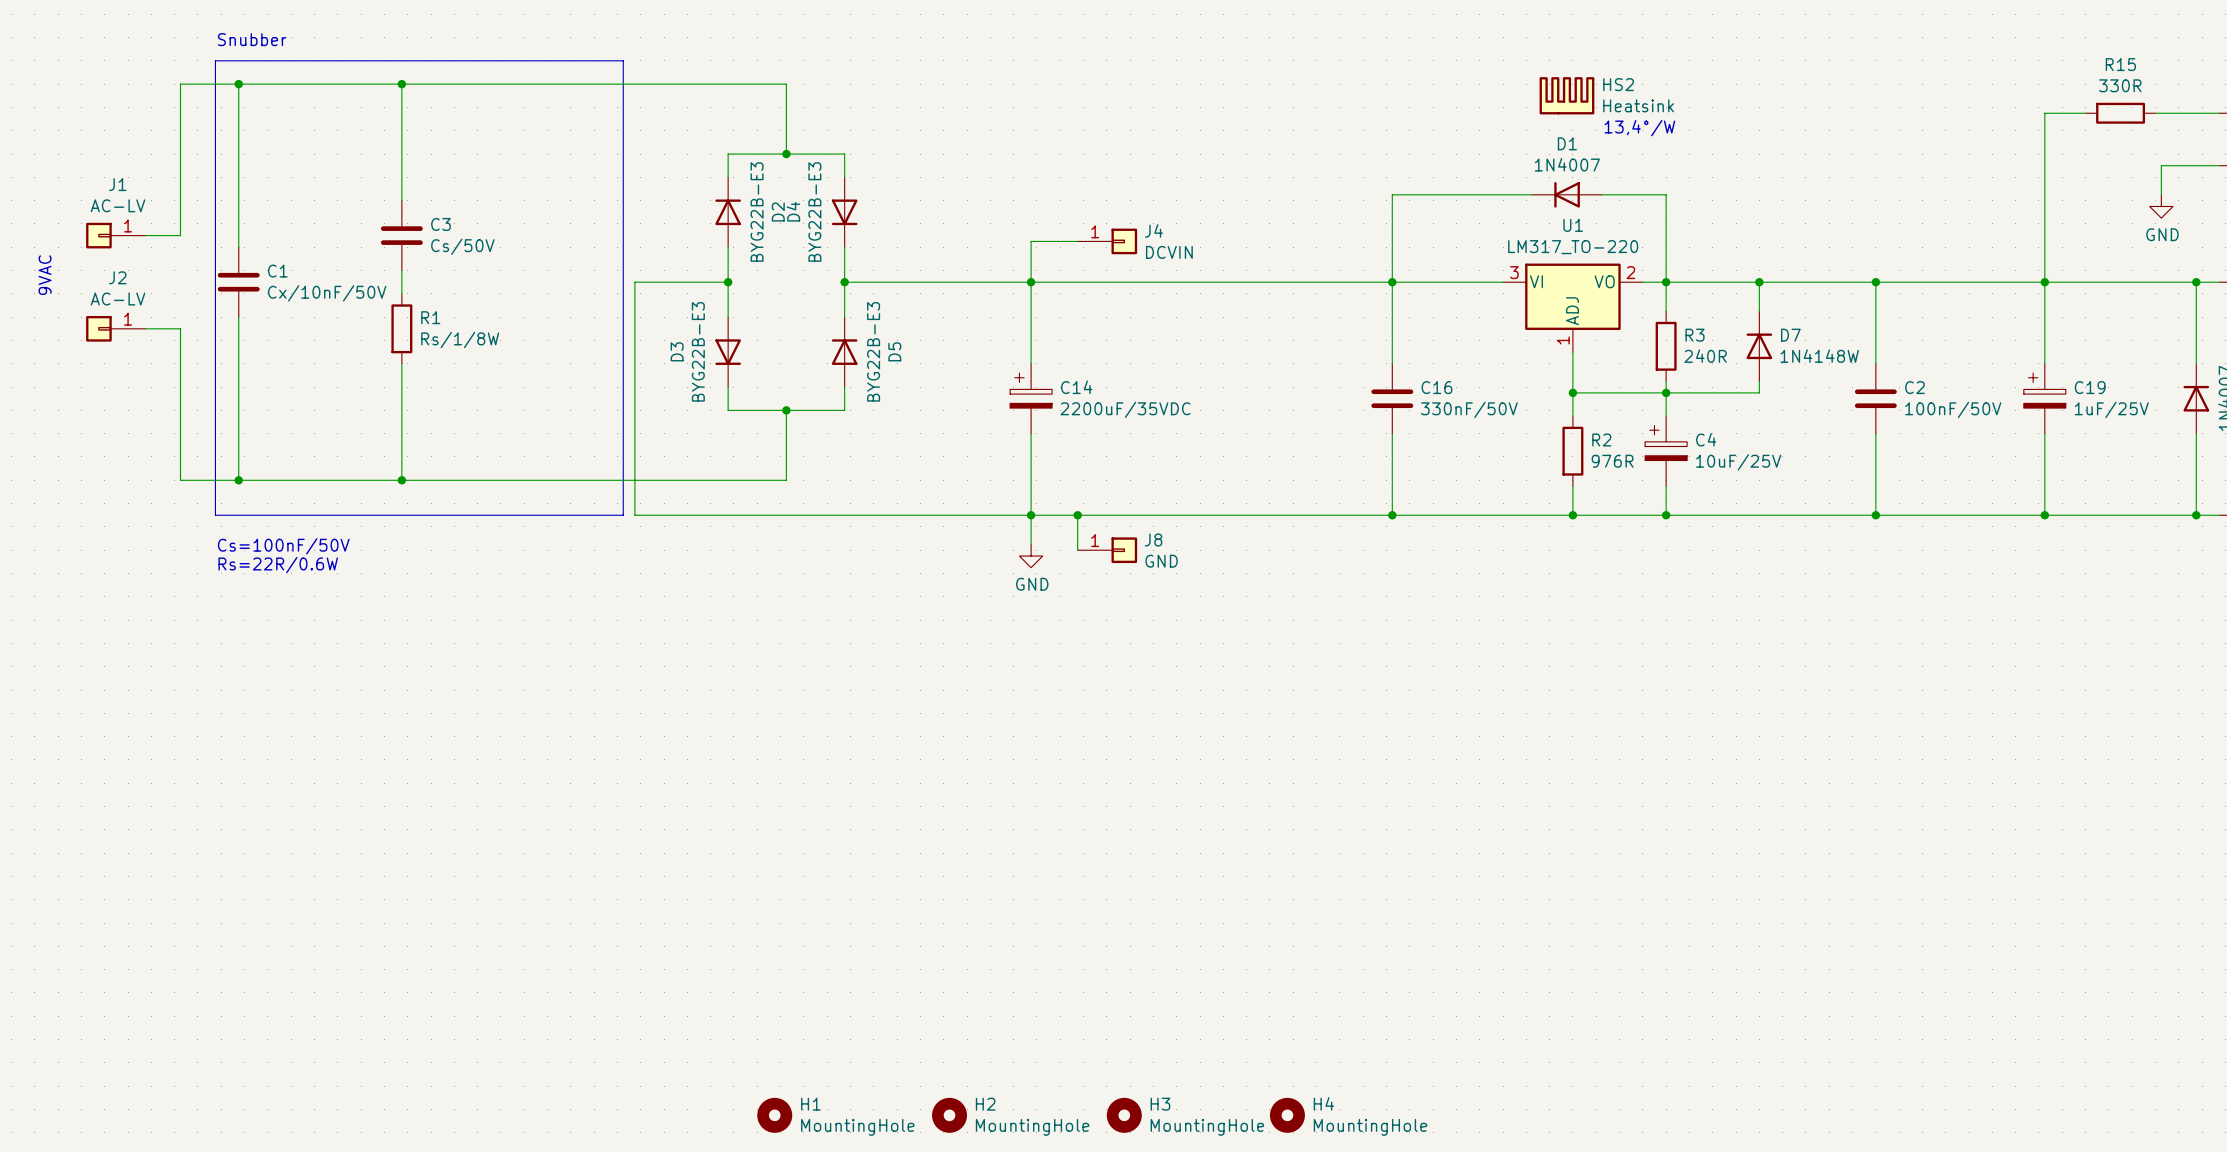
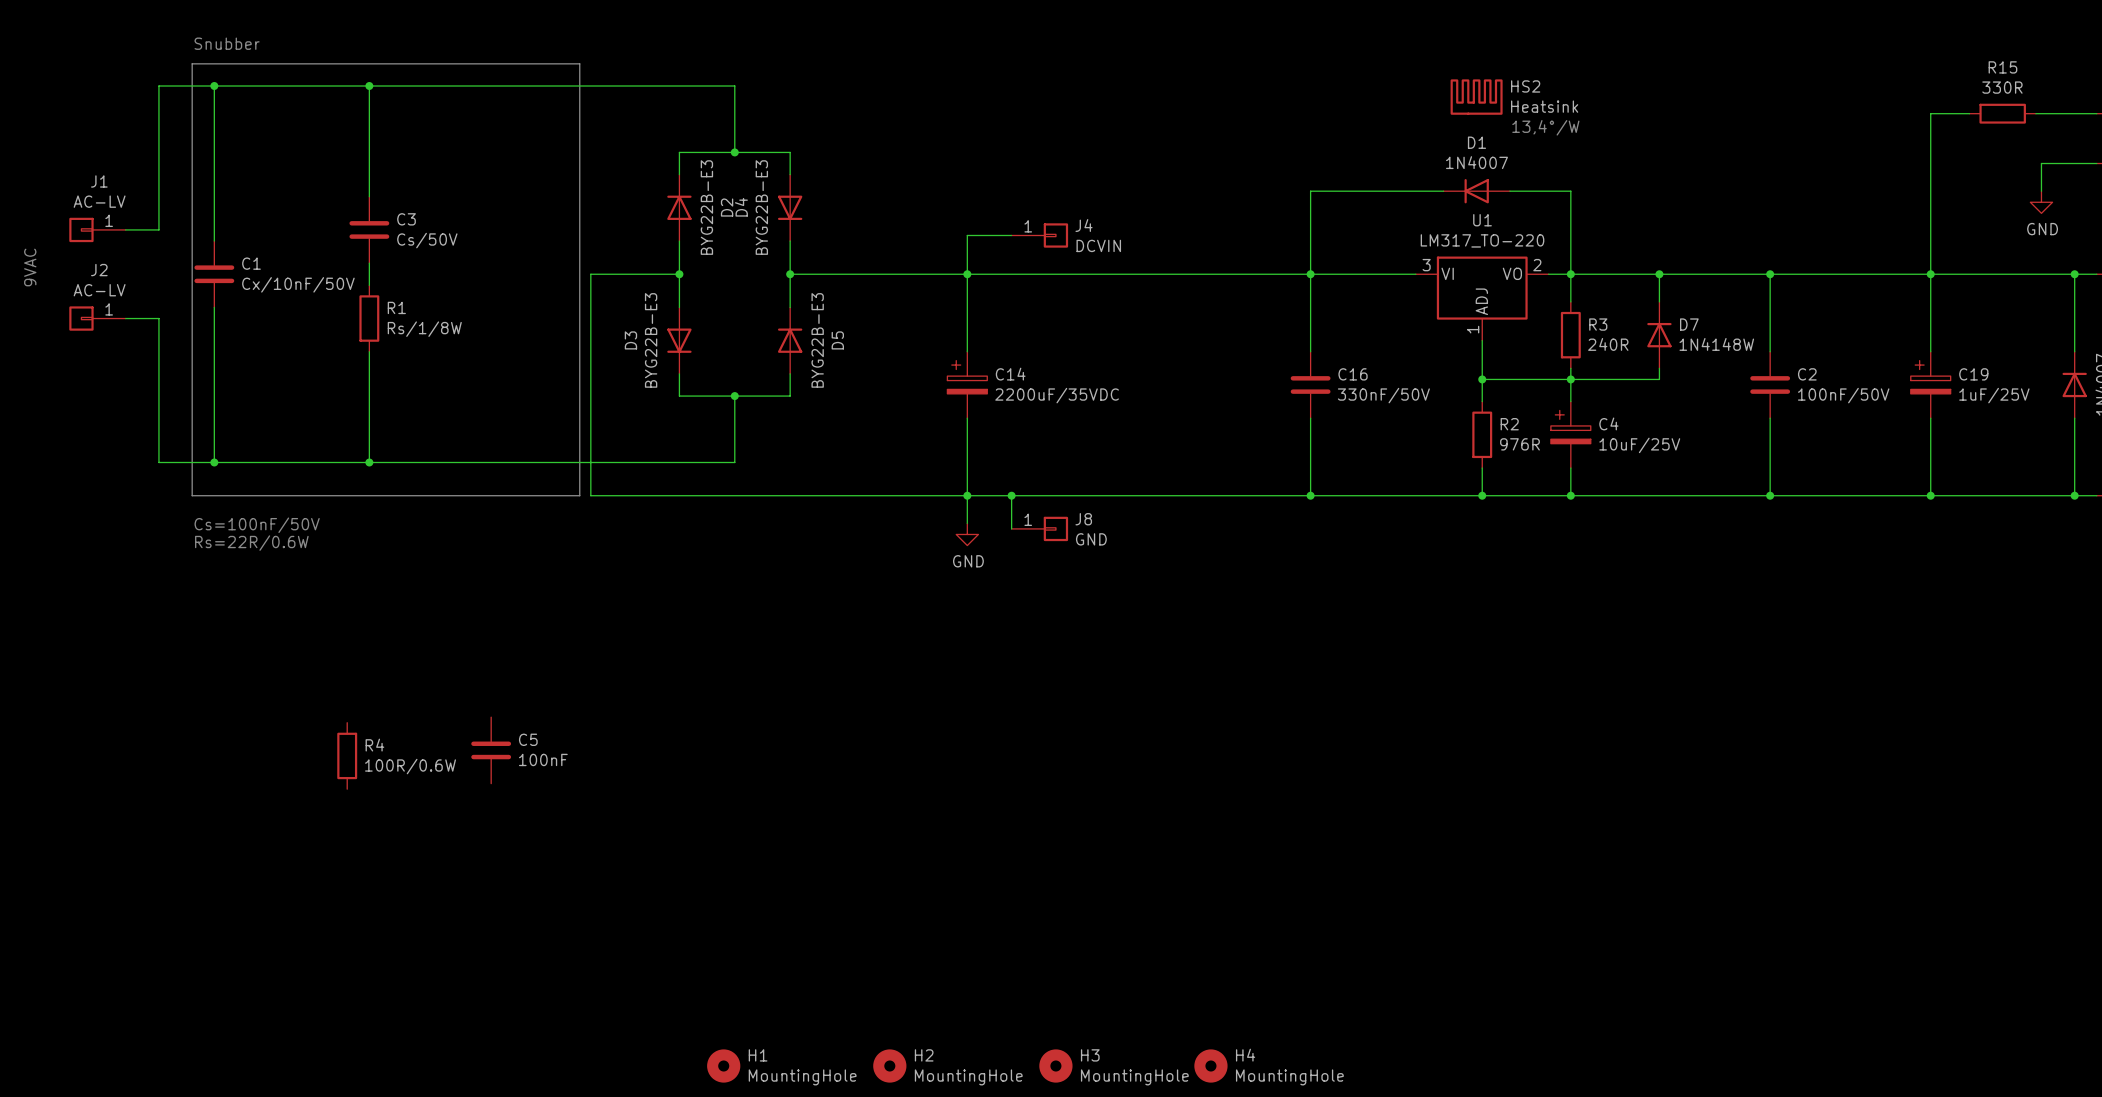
C5: none -> 100nF (491, 750)
R4: none -> 100R/0.6W (347, 755)

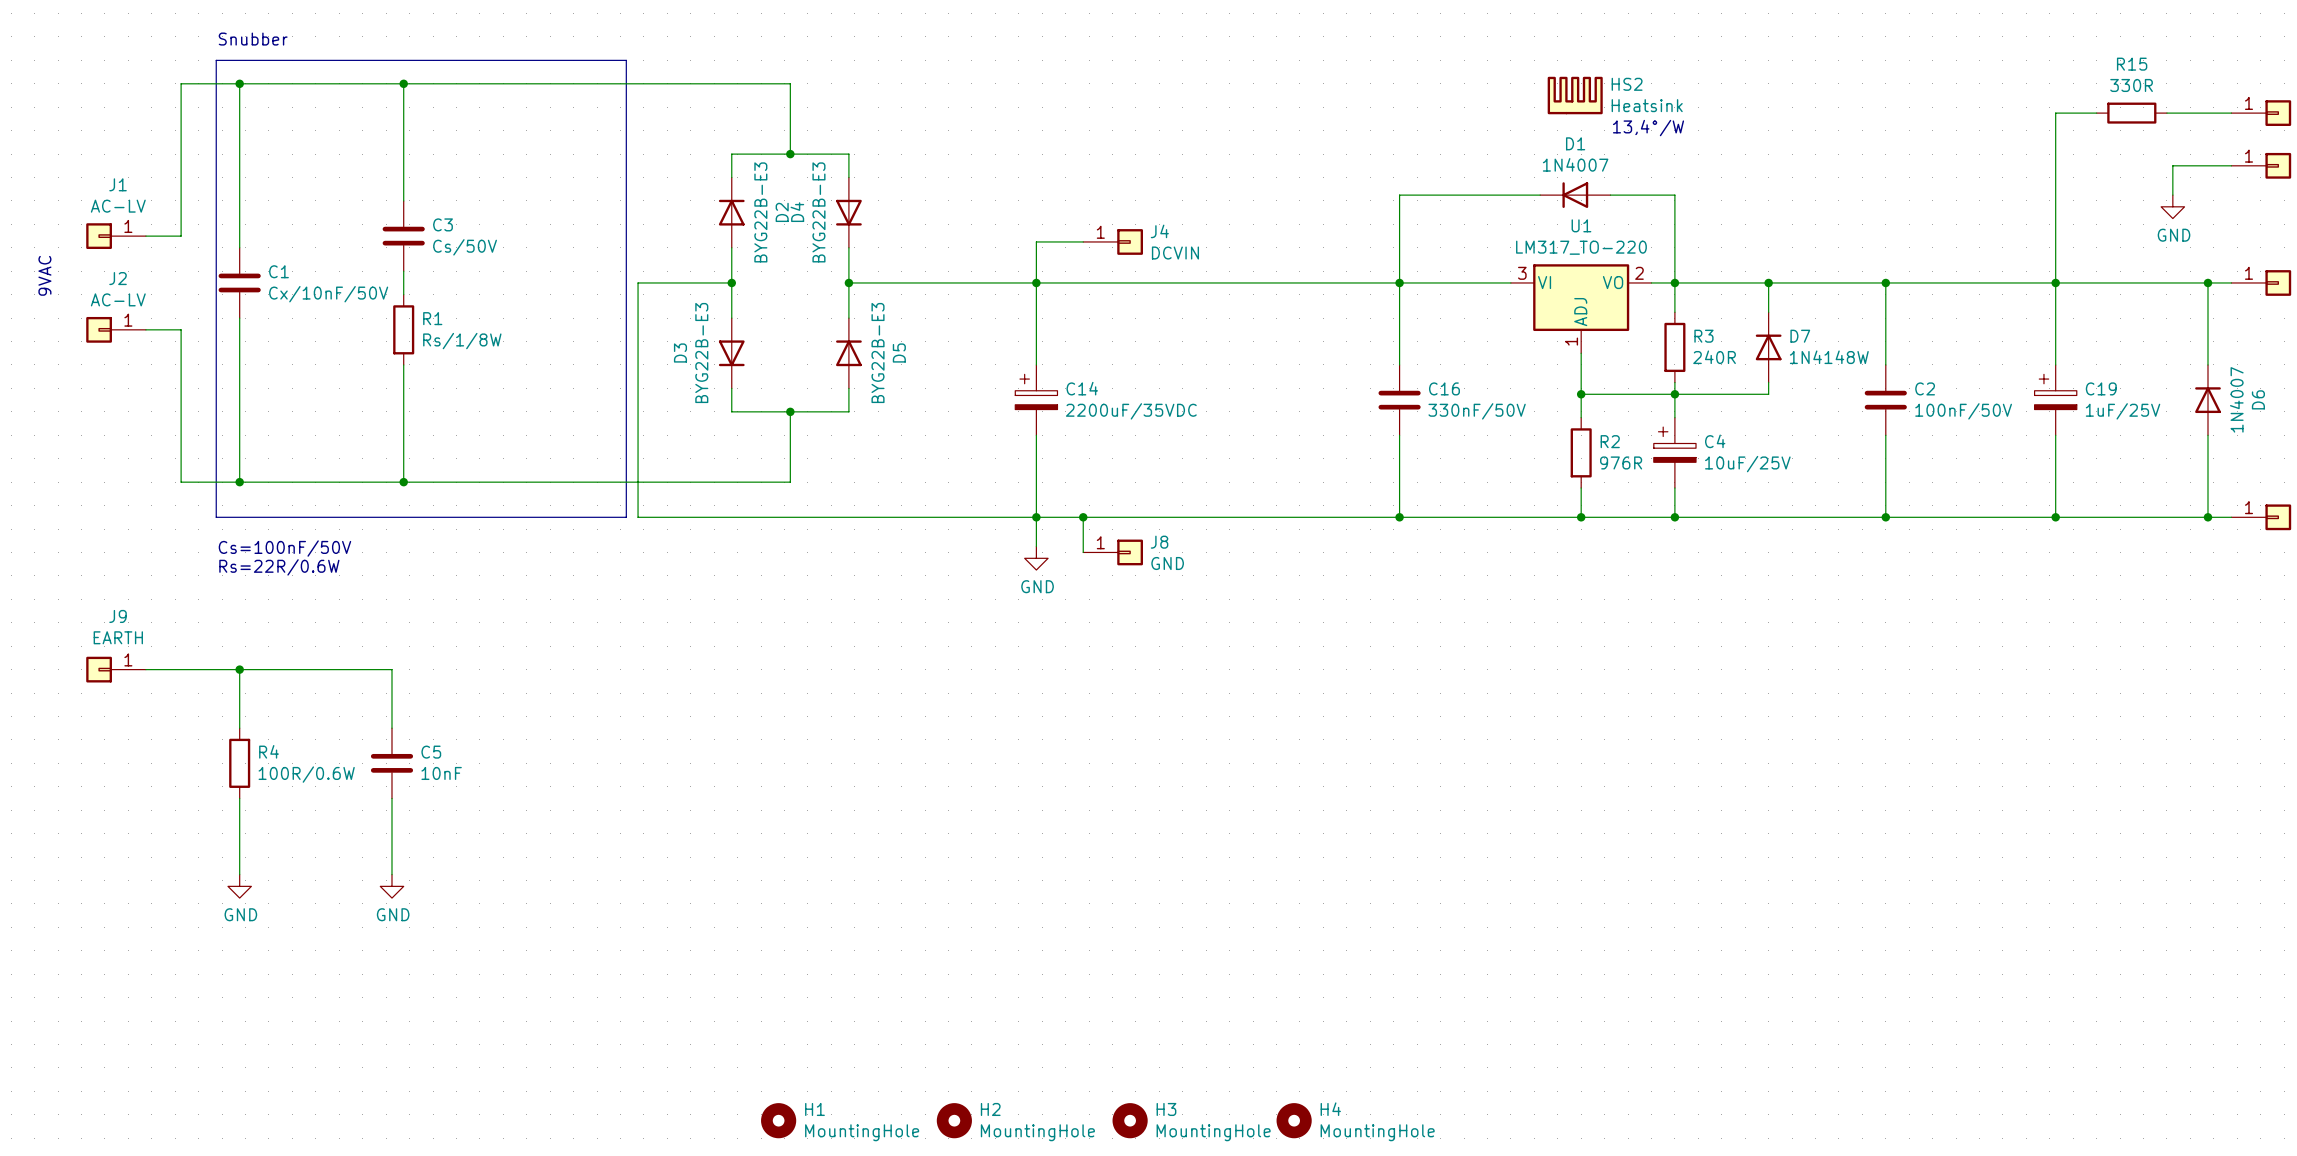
J9: none -> EARTH (116, 669)
wire: none -> (145, 669) (391, 669) (391, 728)
wire: none -> (239, 669) (239, 728)
junction: none -> (239, 669)
C5 position: (491, 750) -> (391, 763)
R4 position: (347, 755) -> (239, 763)
C5 value: 100nF (543, 759) -> 10nF (441, 773)
wire: none -> (239, 798) (239, 874)
wire: none -> (391, 798) (391, 874)
power symbol: none -> GND (239, 886)
power symbol: none -> GND (391, 886)

